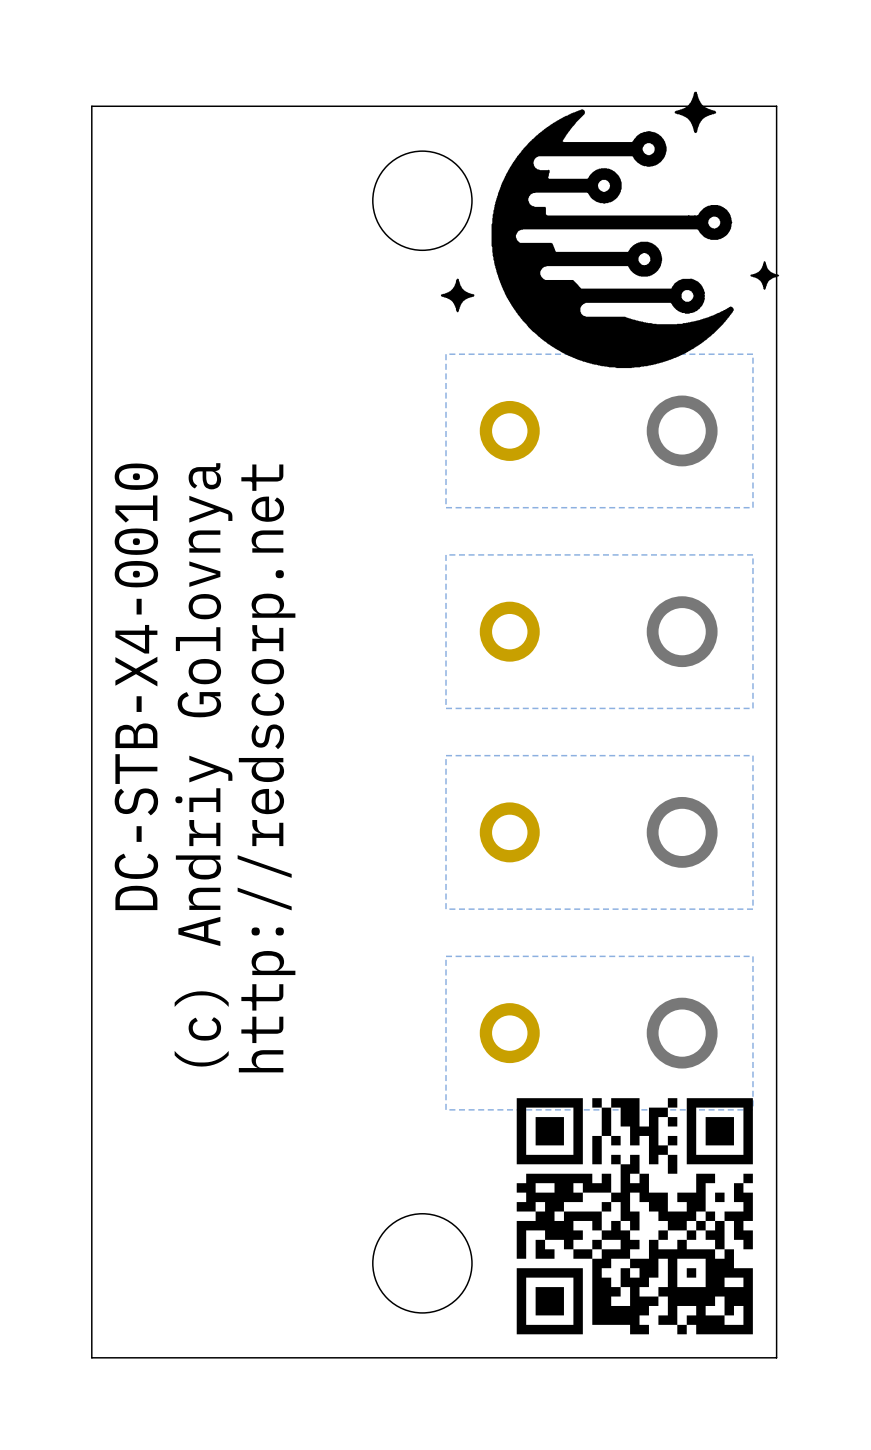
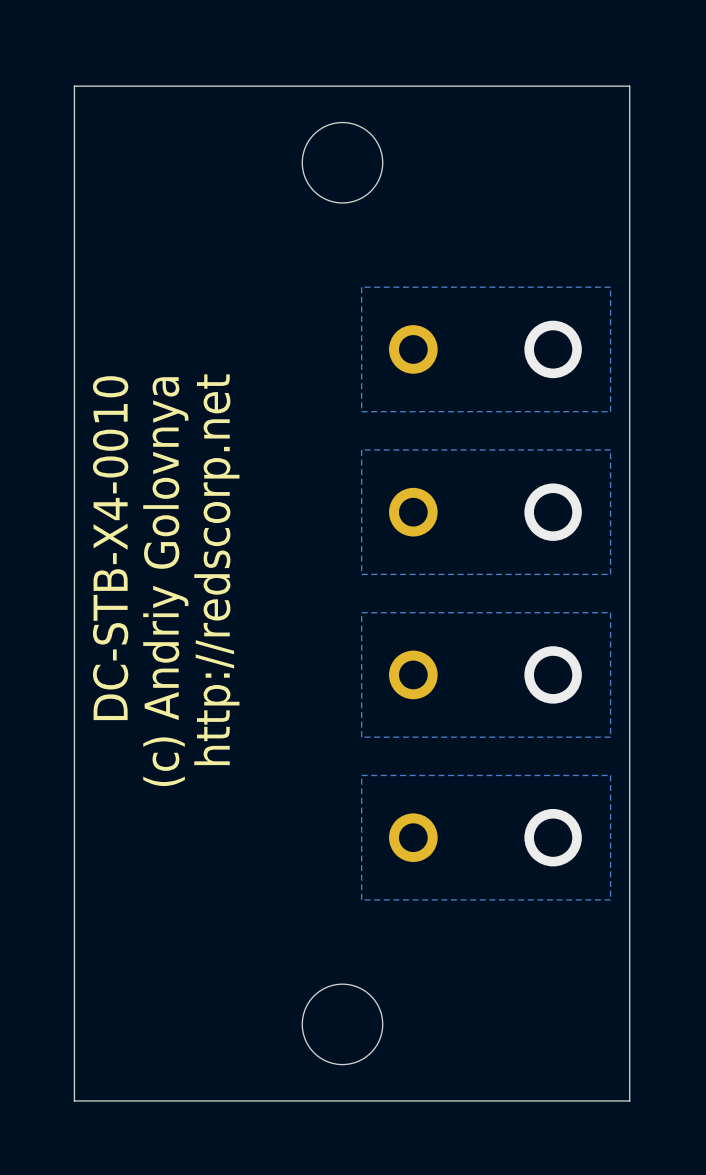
drawing: [440, 91, 780, 369] -> none
drawing: [516, 1098, 753, 1335] -> none

